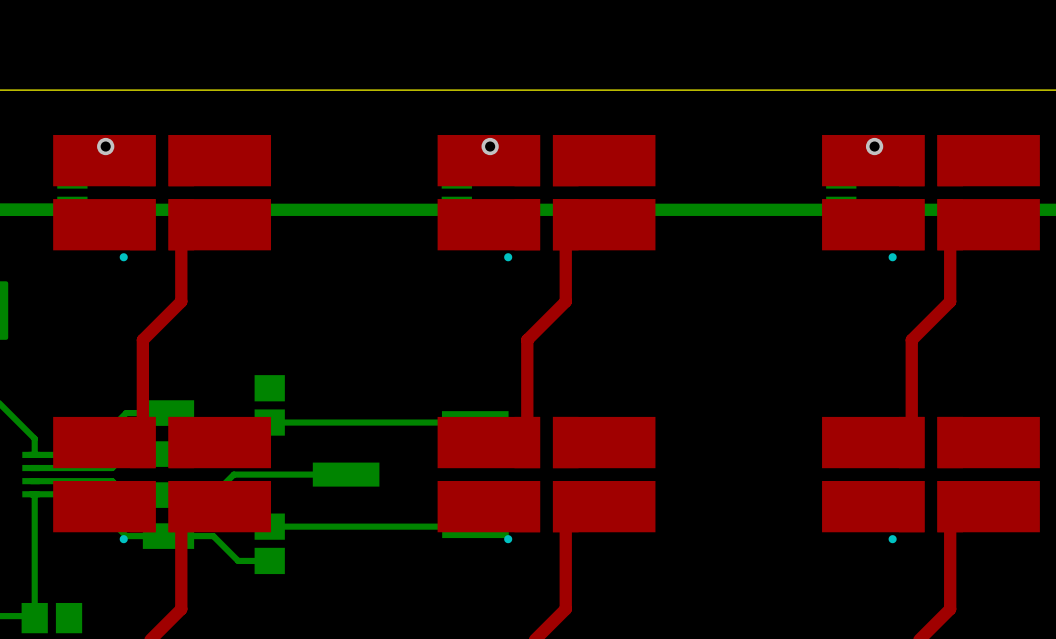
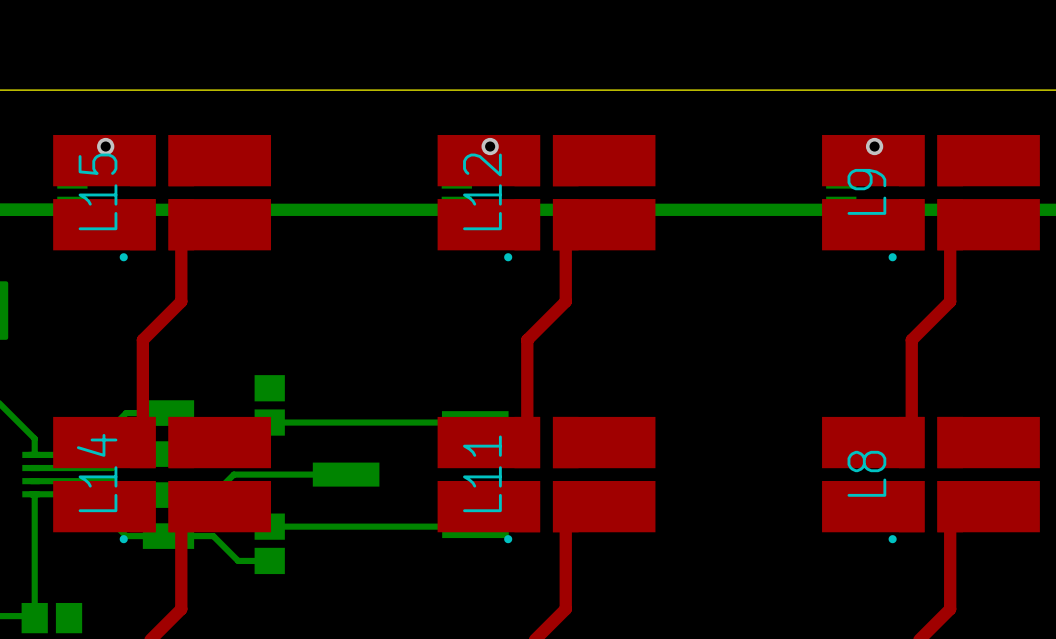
text: none -> L15 (98, 191)
text: none -> L12 (482, 191)
text: none -> L9 (866, 191)
text: none -> L14 (97, 473)
text: none -> L11 (482, 473)
text: none -> L8 (866, 473)

